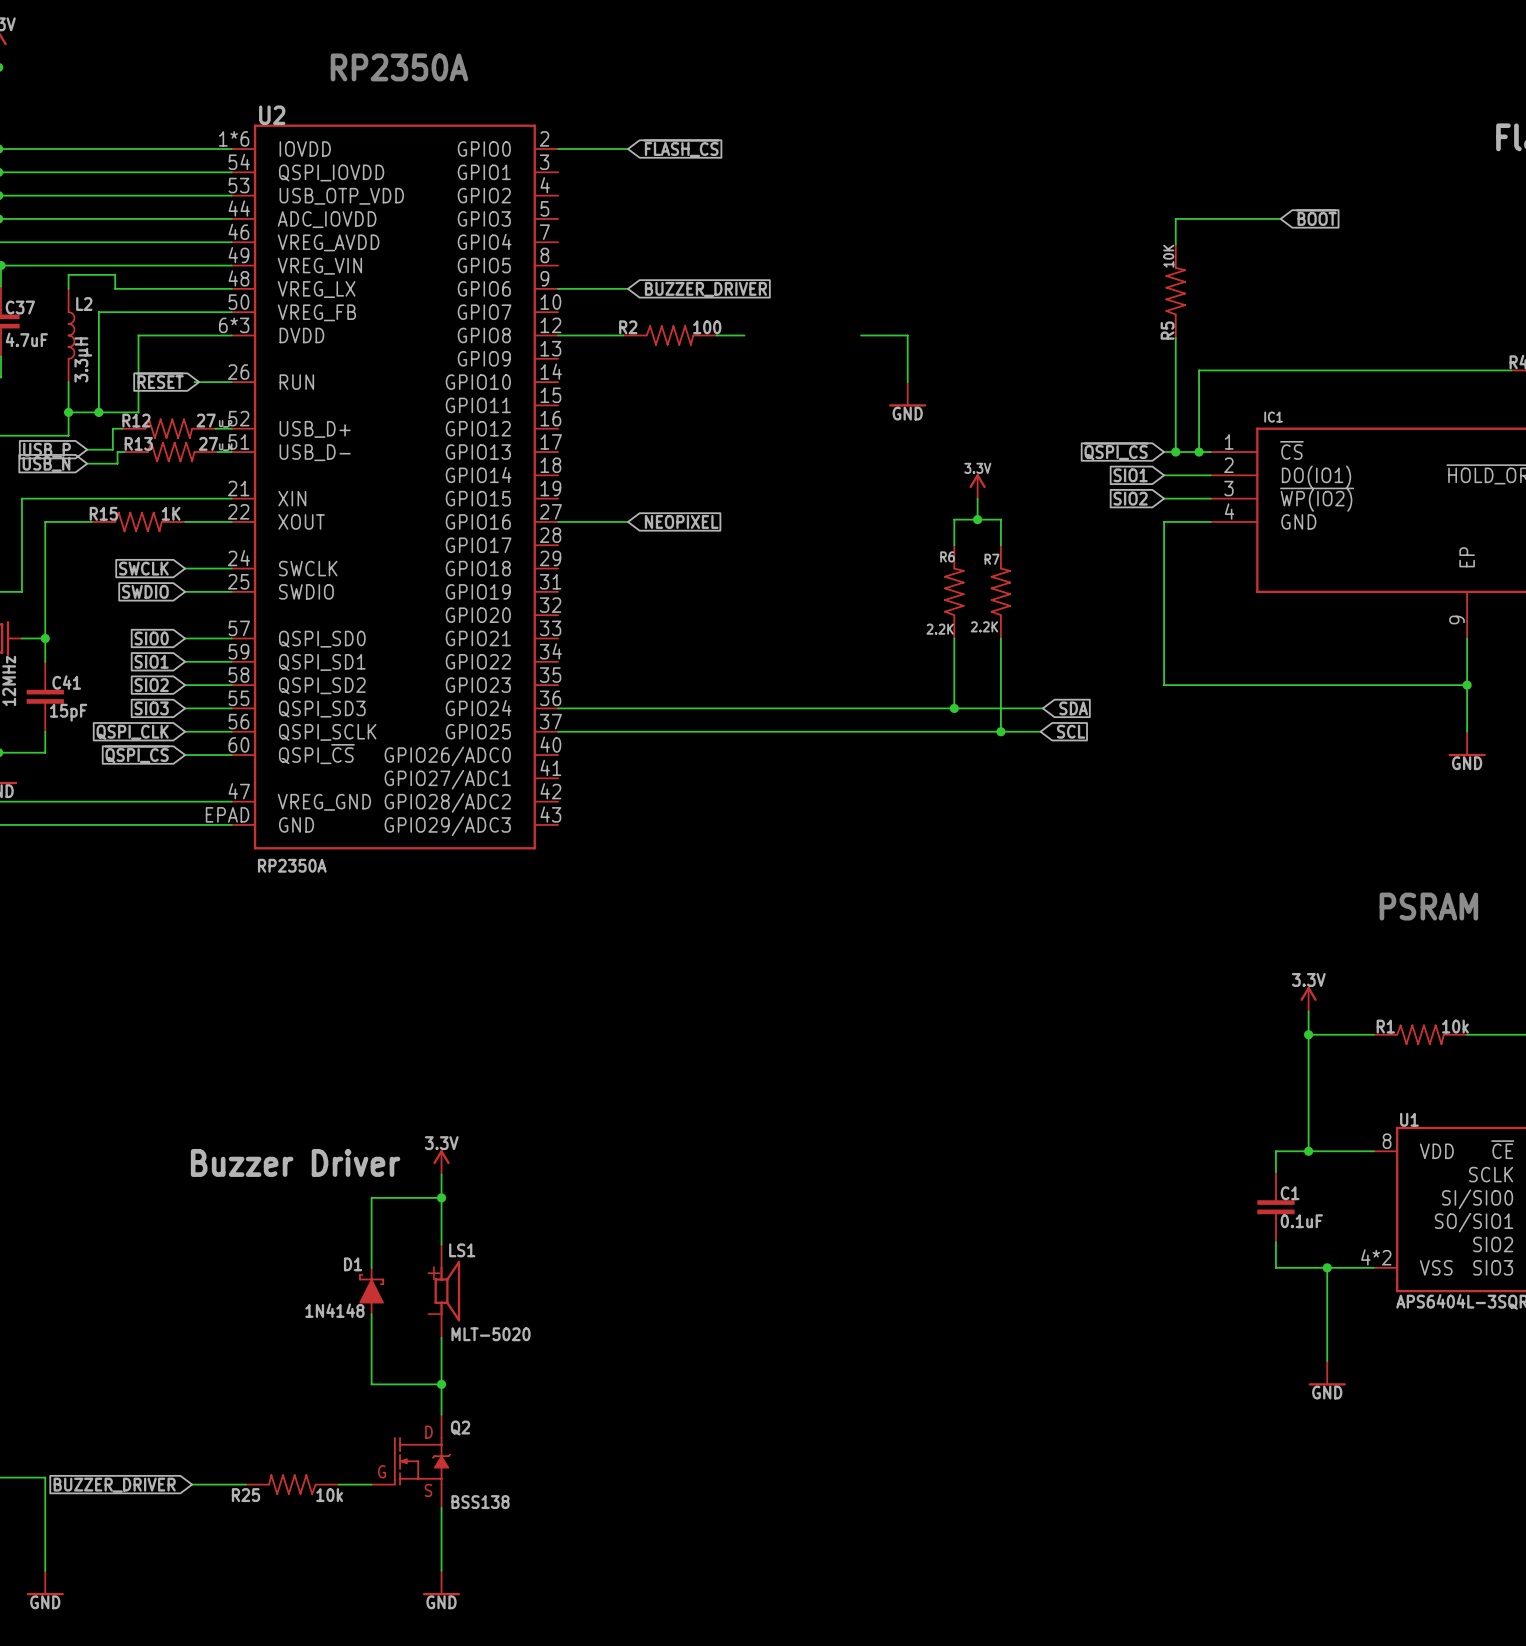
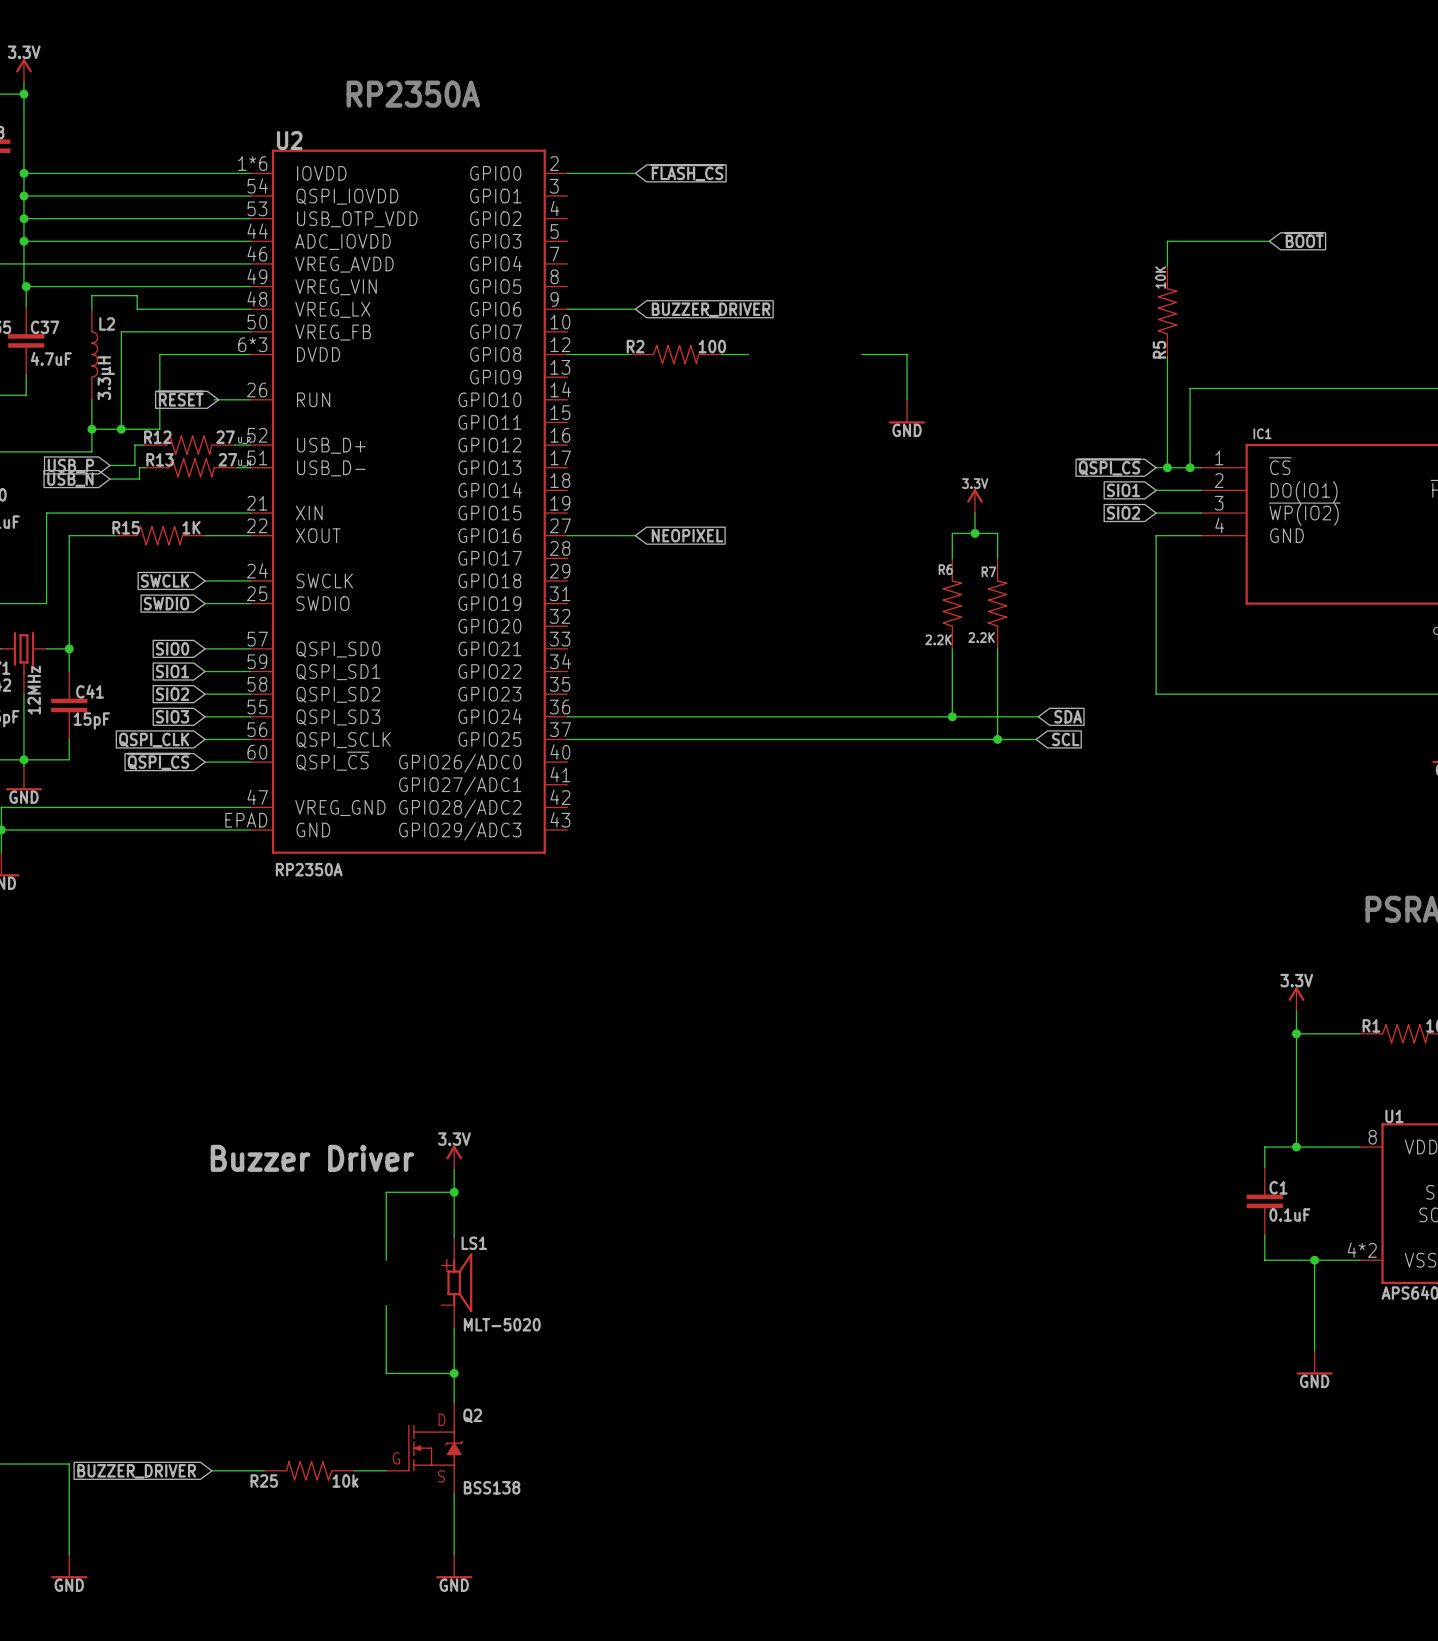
D1: 1N4148 (371, 1291) -> none

